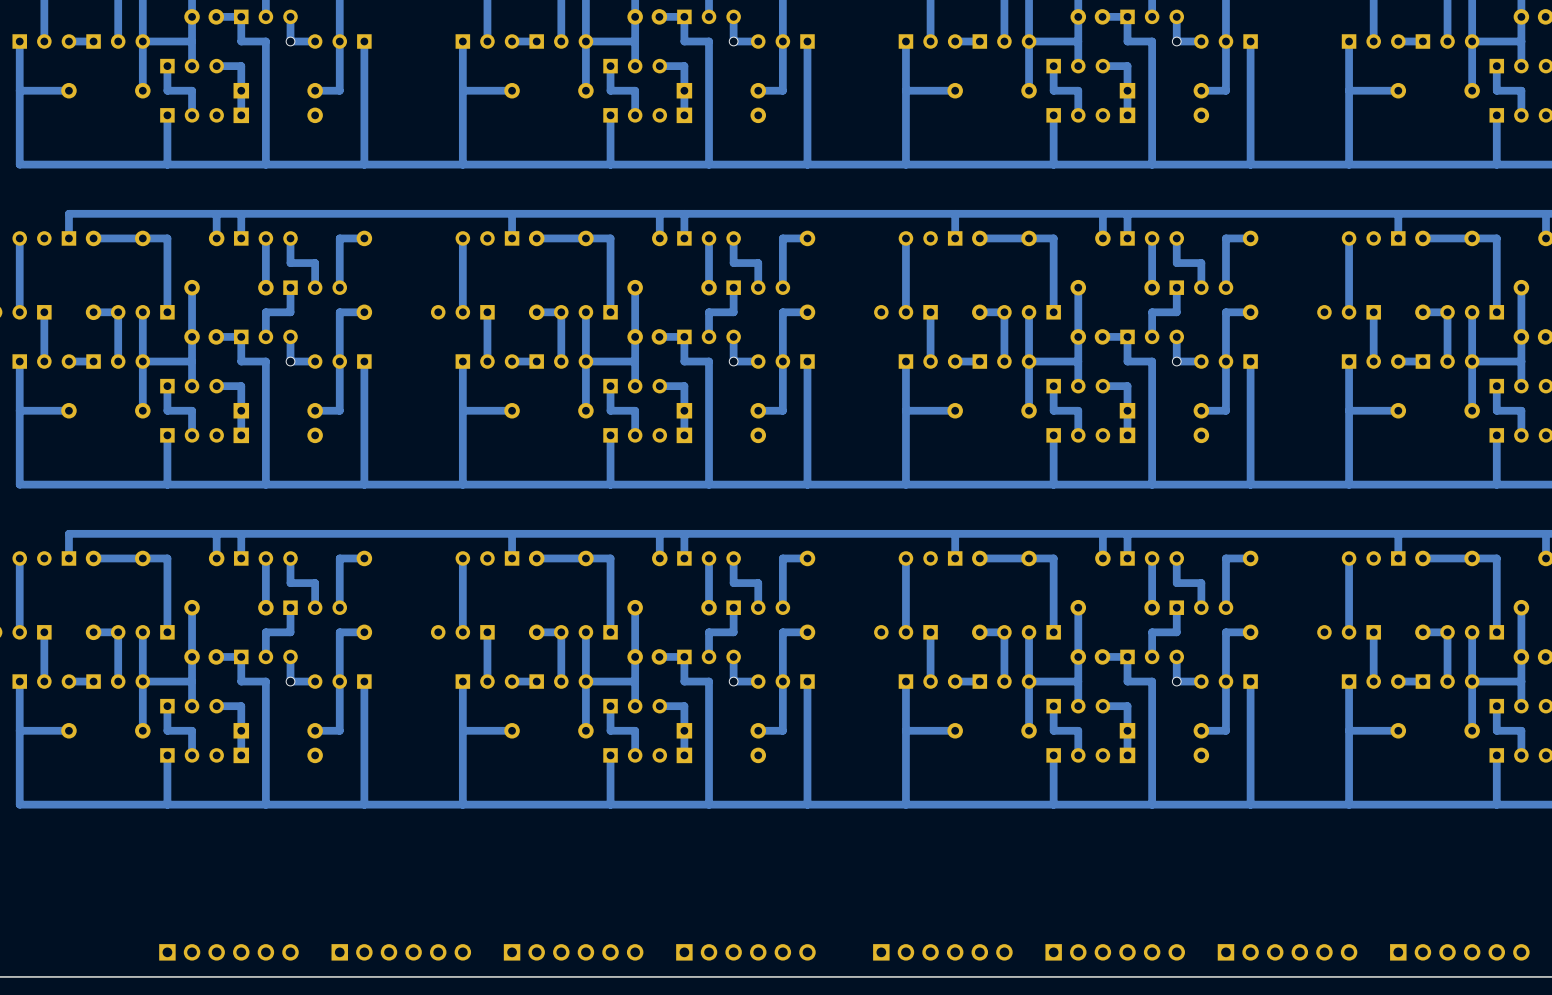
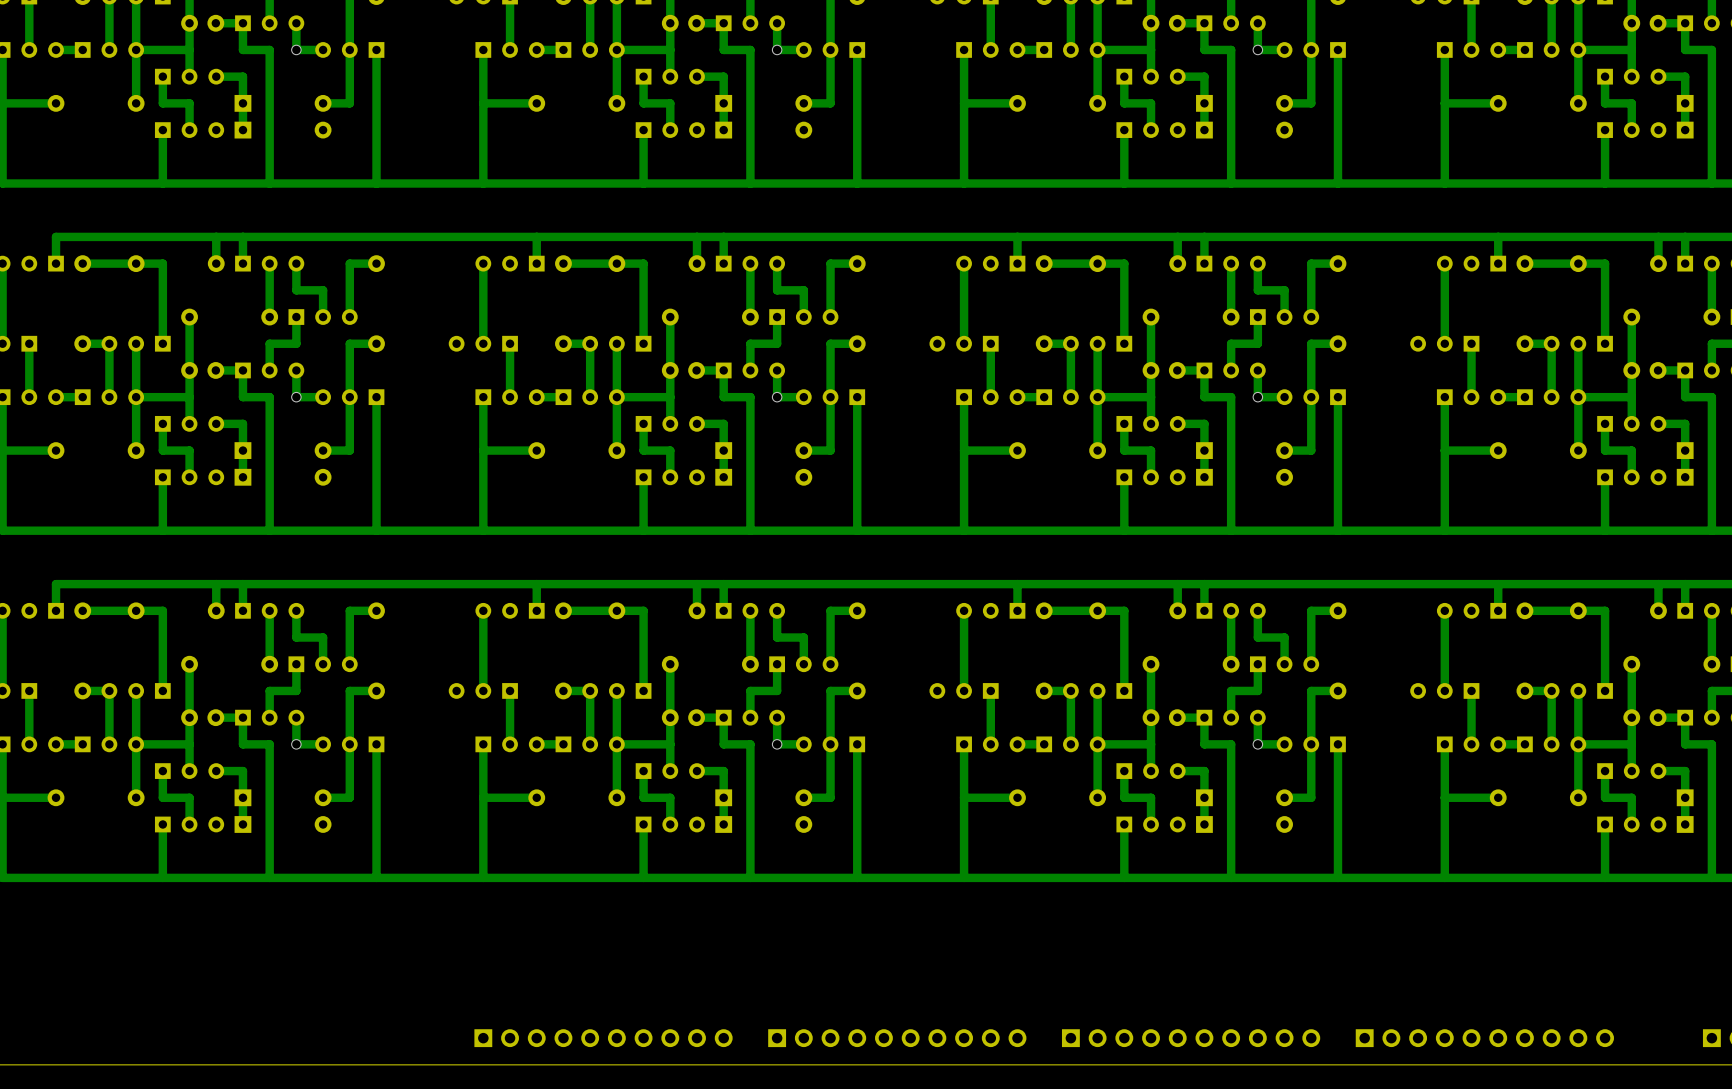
part footprint: [503, 944, 644, 961] -> [474, 1029, 733, 1048]
part footprint: [1045, 944, 1185, 961] -> [1061, 1029, 1321, 1048]
part: (228, 952) -> none
part: (401, 952) -> none
part: (745, 952) -> none
part: none -> (897, 1038)
part: (942, 952) -> none
part: (1287, 952) -> none
part: none -> (1484, 1038)
part: (1459, 952) -> none

